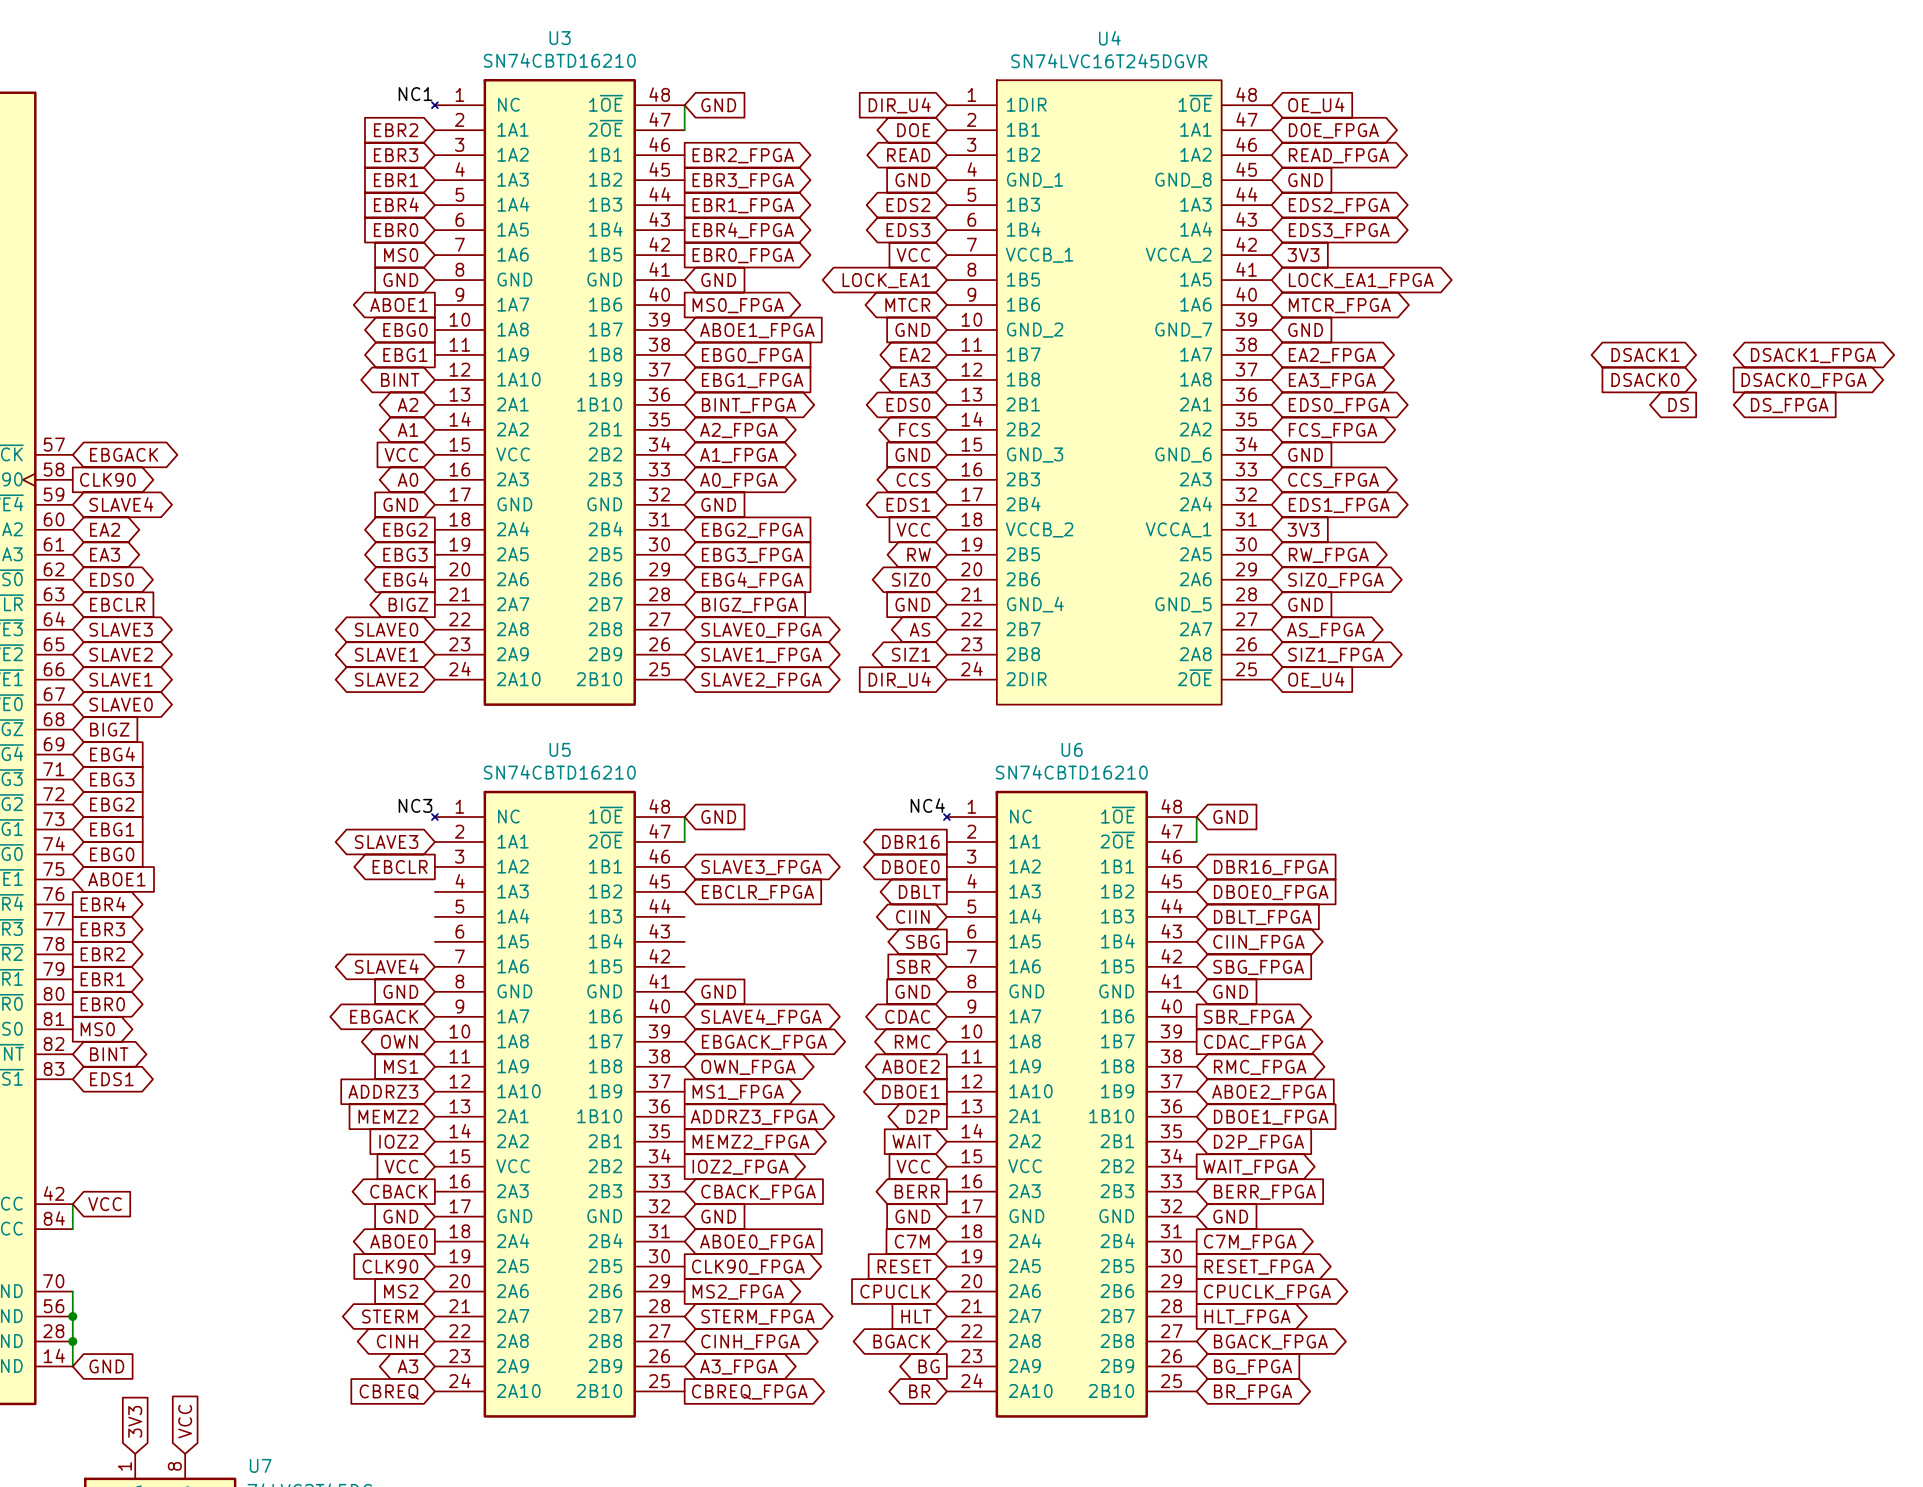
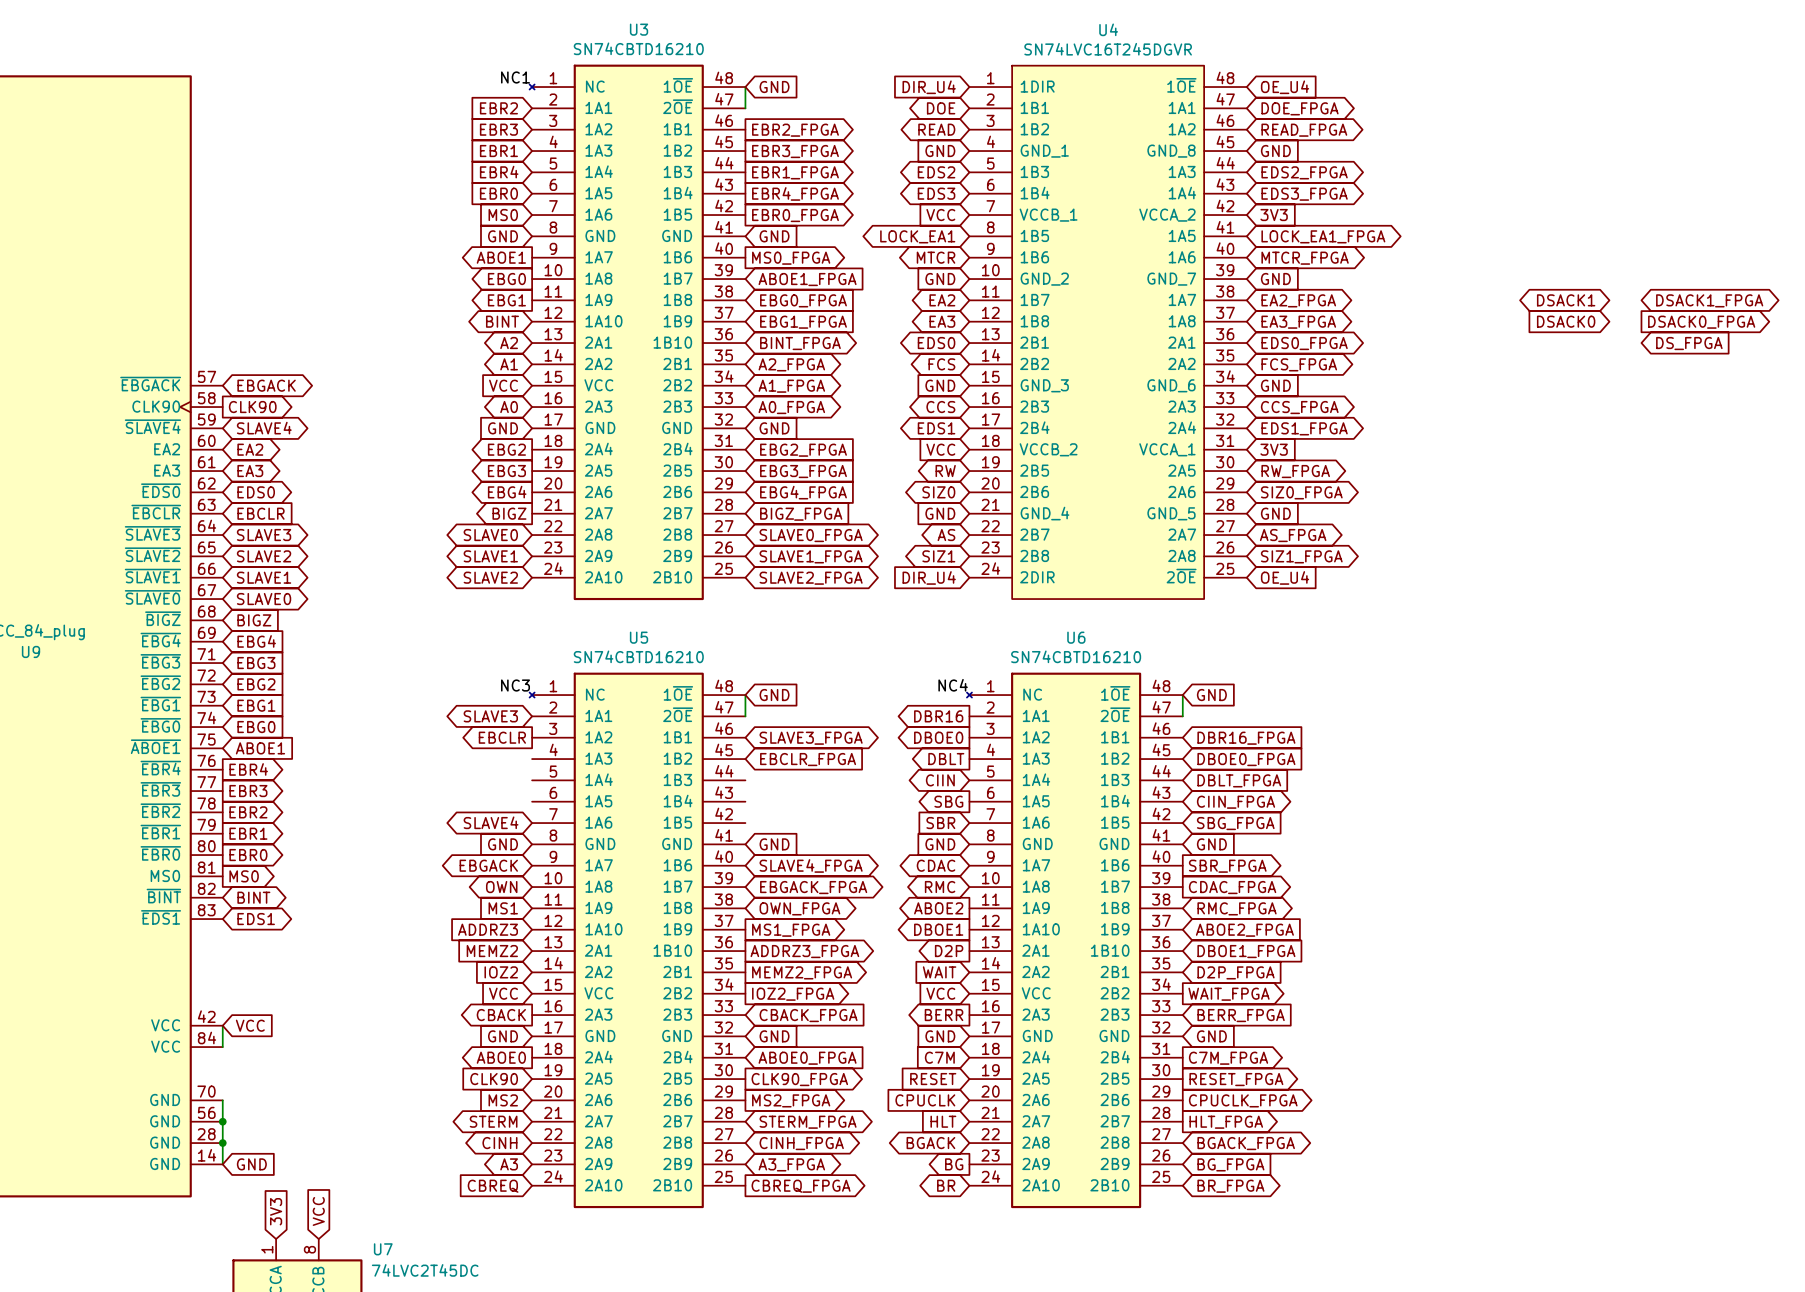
global label: DS (1678, 404) -> none

